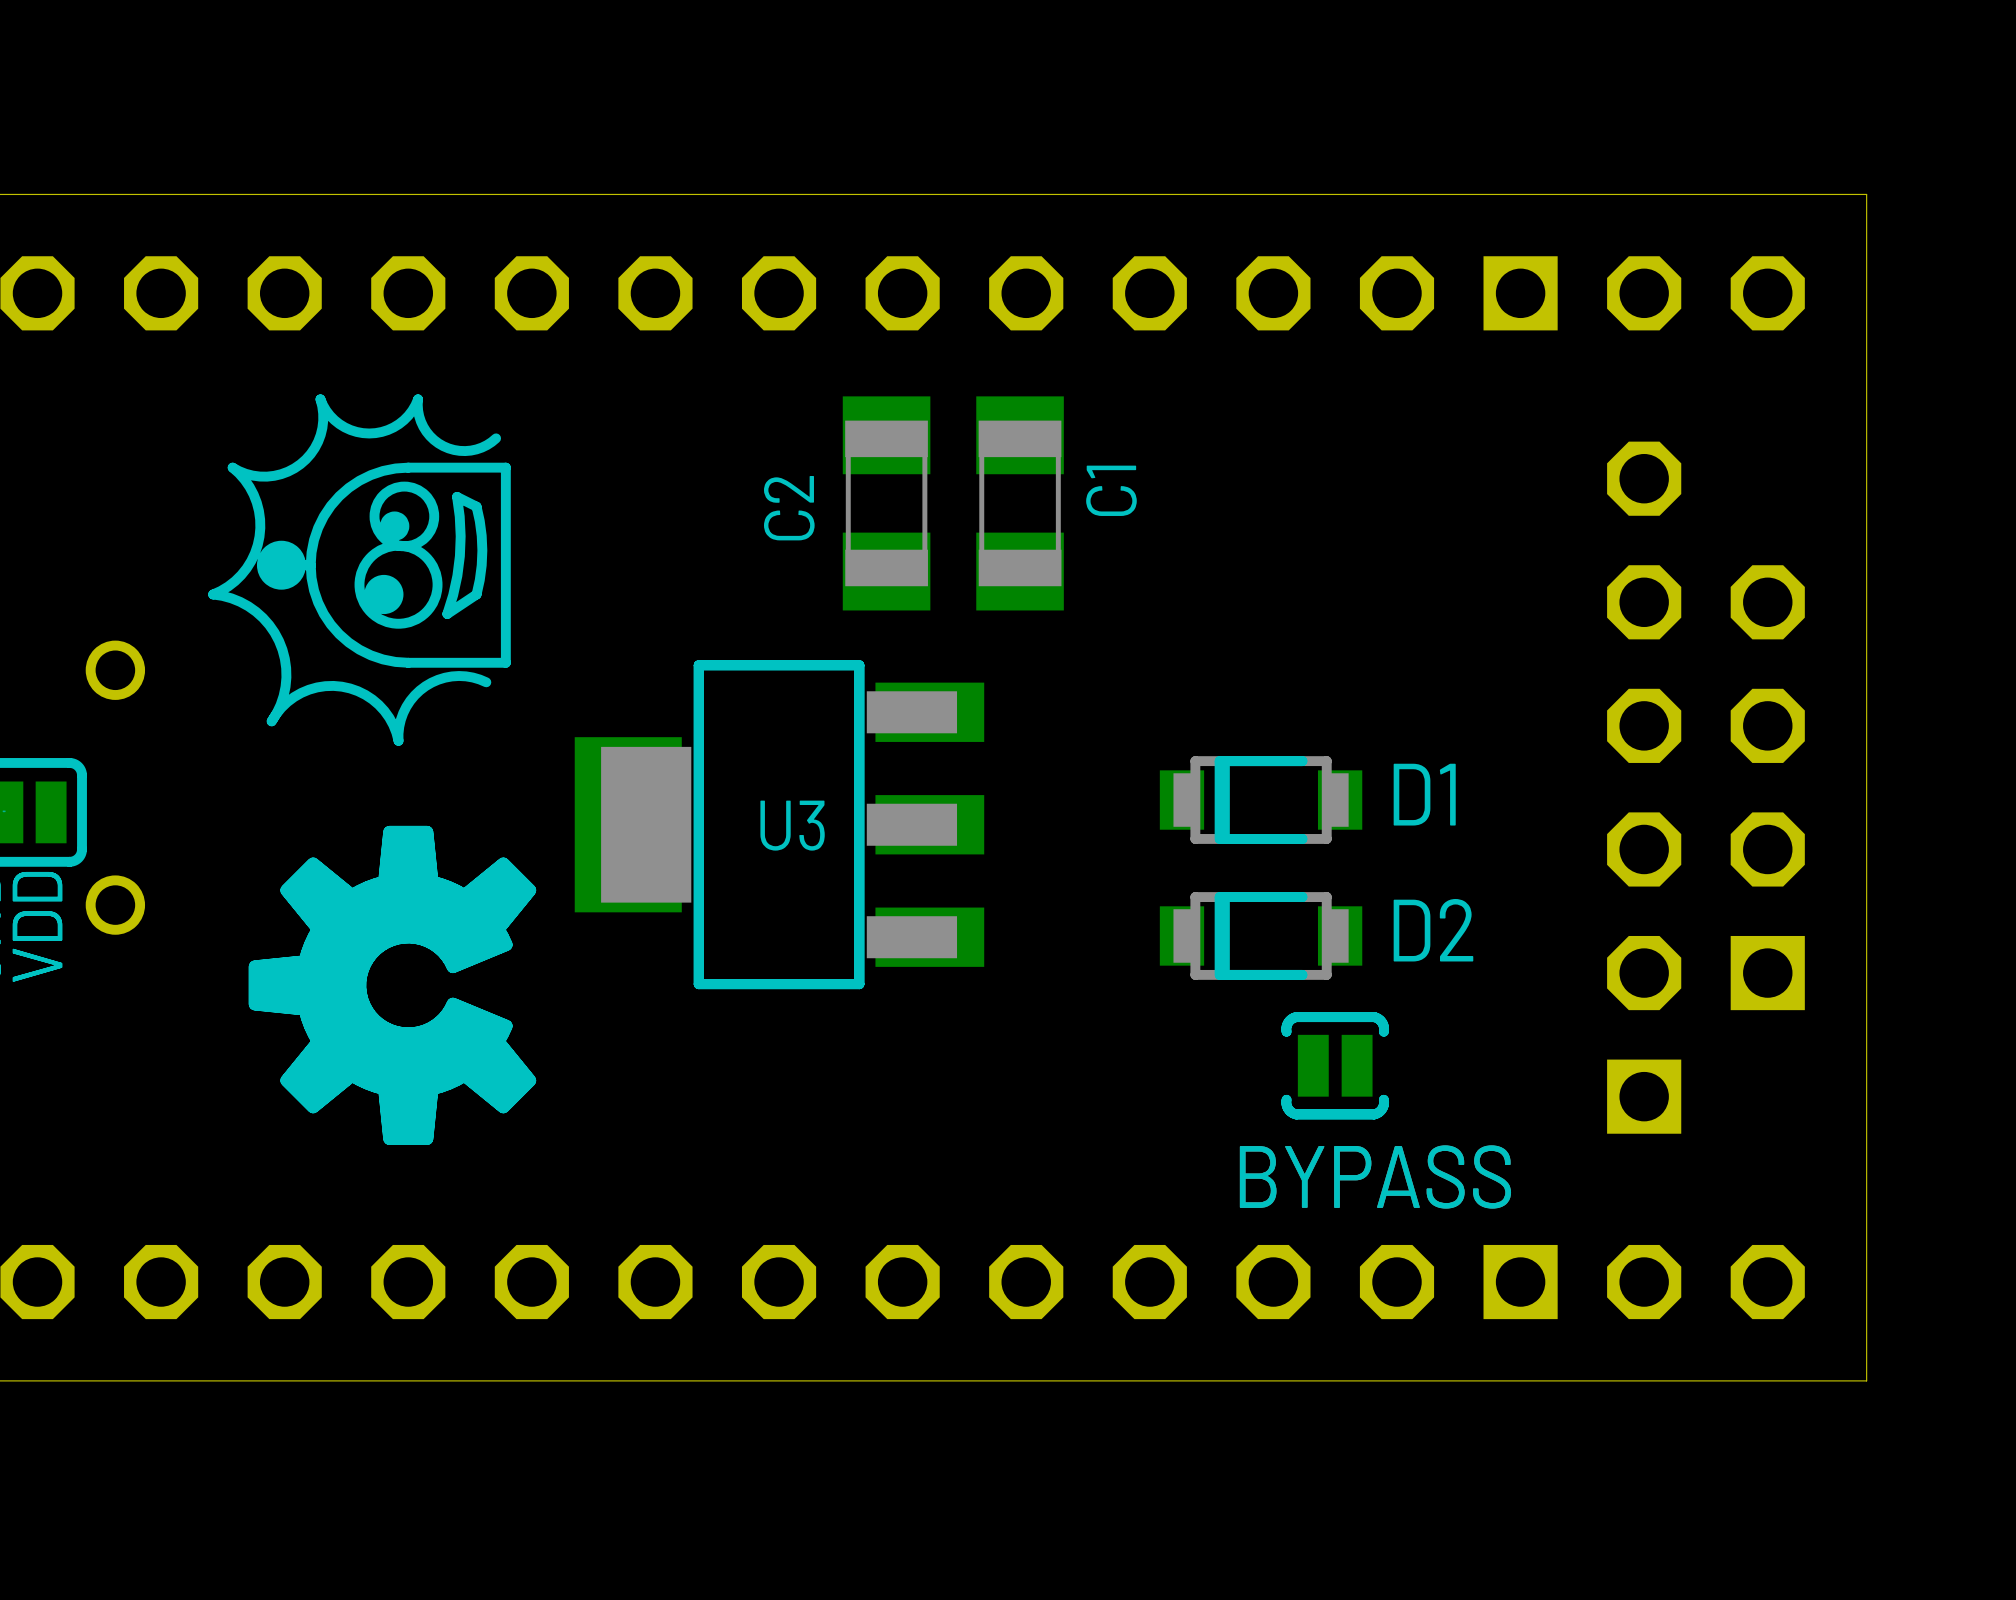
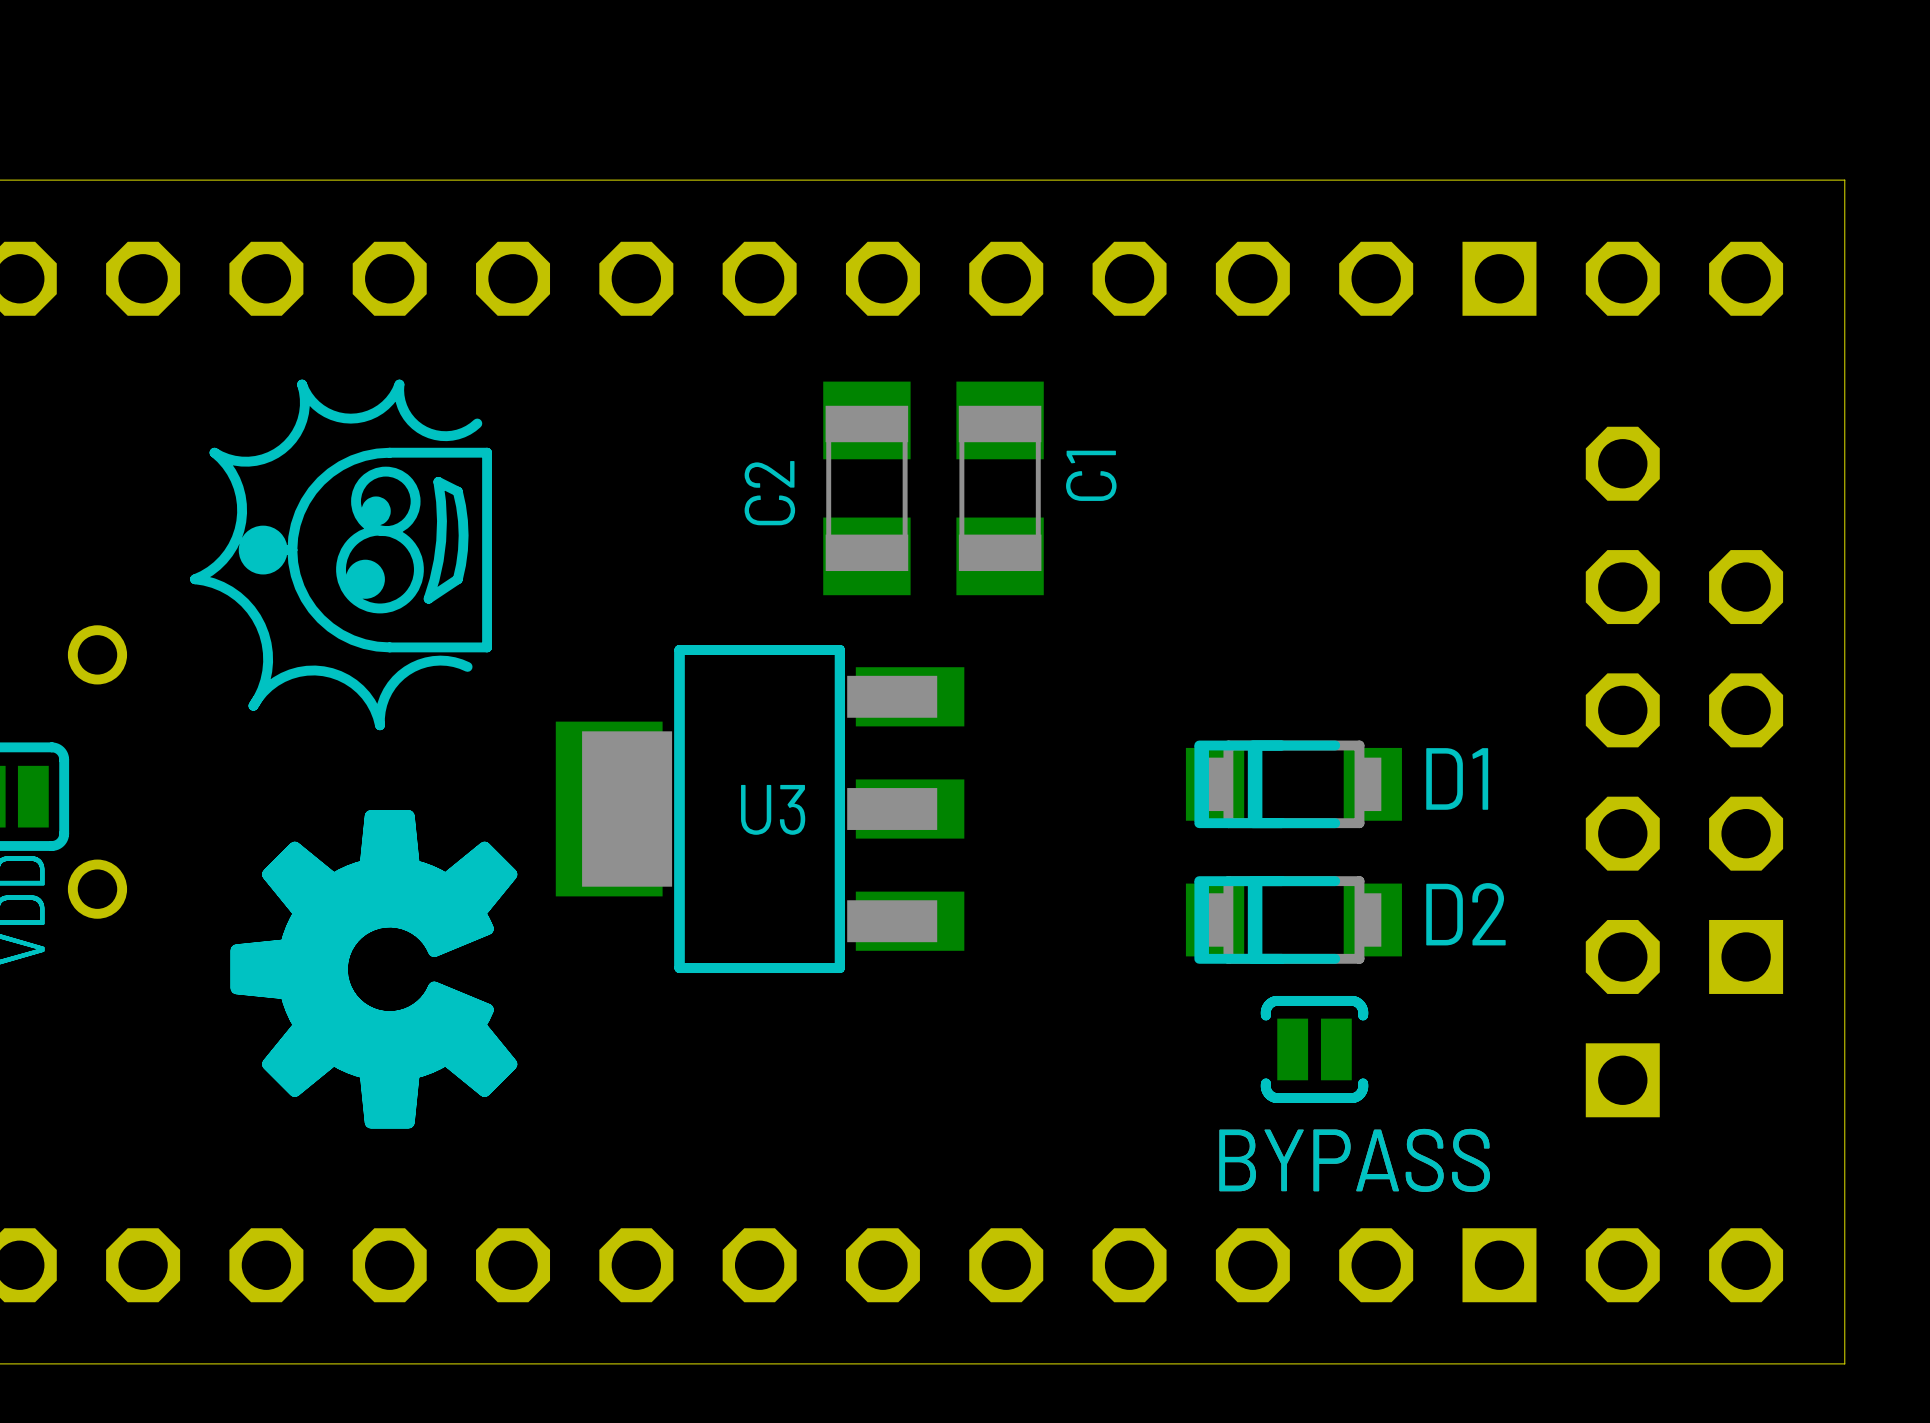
D1 footprint: [1159, 756, 1363, 844] -> [1185, 740, 1402, 829]
D2 footprint: [1159, 892, 1363, 980] -> [1185, 876, 1402, 964]

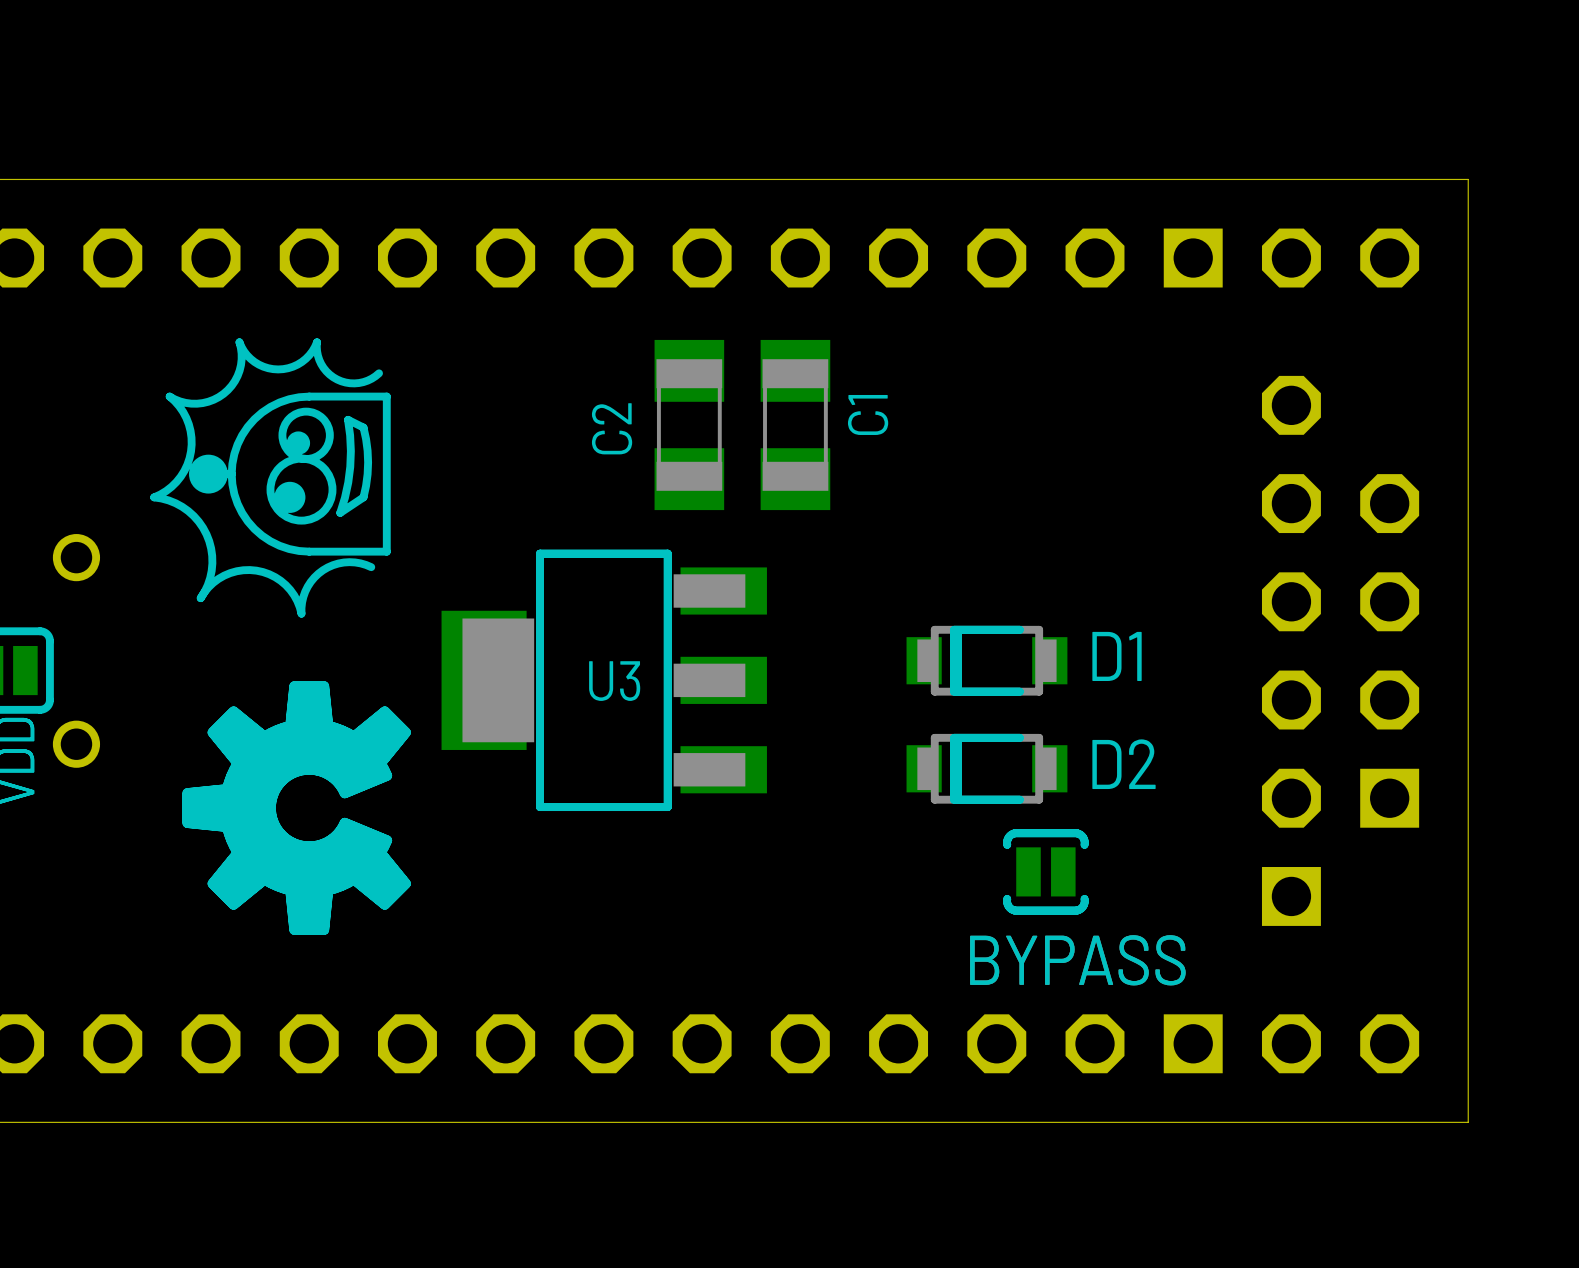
D1 footprint: [1185, 740, 1402, 829] -> [906, 625, 1068, 696]
D2 footprint: [1185, 876, 1402, 964] -> [906, 733, 1068, 804]

